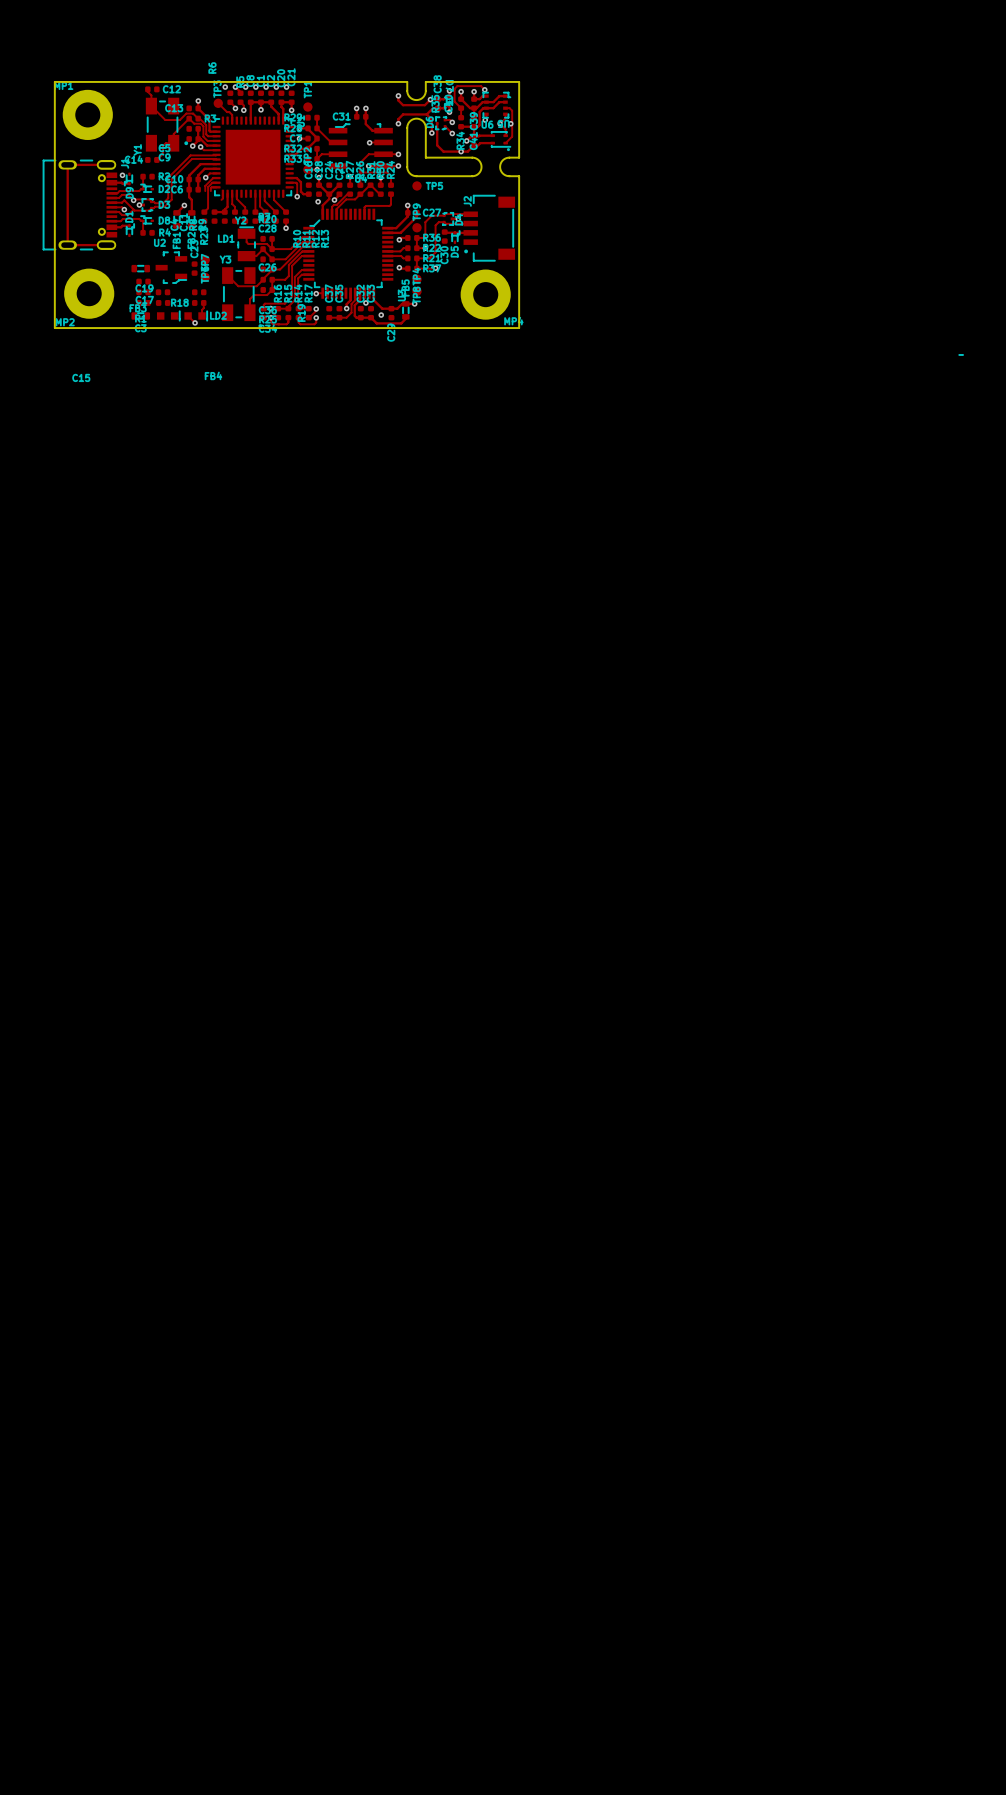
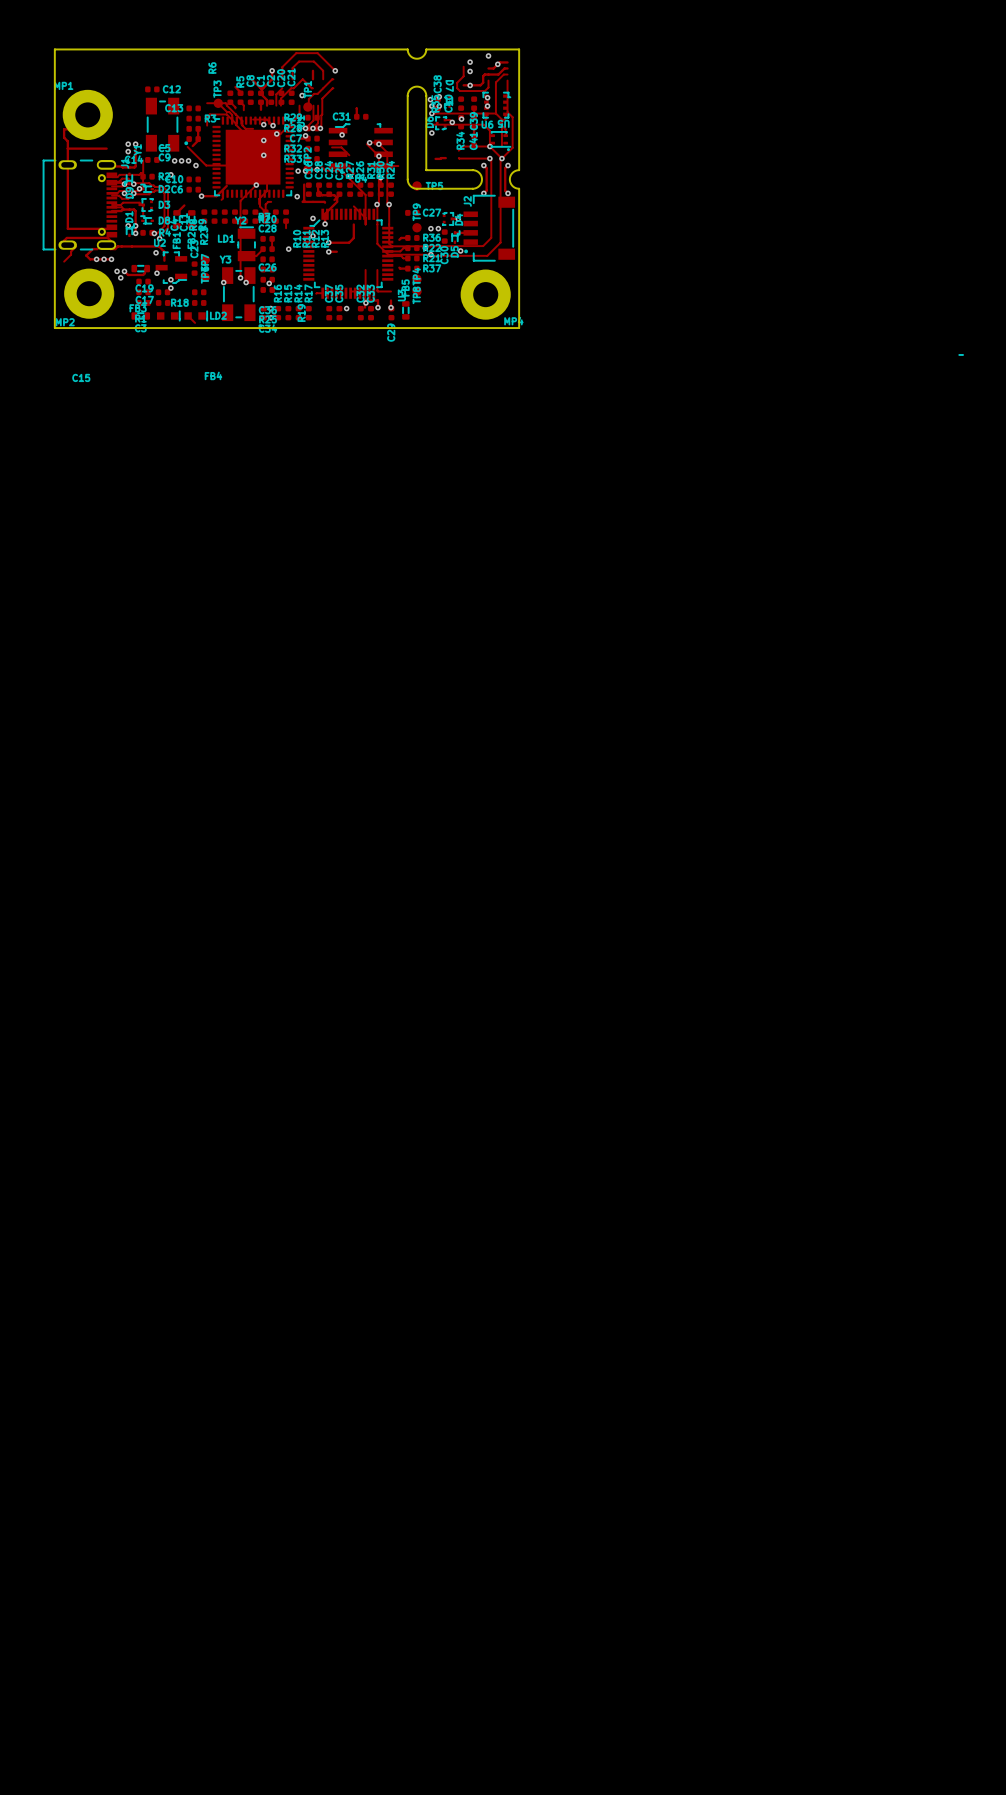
via: none -> (488, 55)
via: none -> (470, 62)
track: none -> (507, 62) (499, 62) (493, 68) (488, 68)
via: none -> (497, 64)
track: none -> (463, 66) (463, 76) (457, 82) (457, 88) (459, 91) (485, 91) (488, 87) (488, 80)
track: none -> (507, 68) (504, 68) (498, 74) (484, 74) (480, 85) (463, 85)
track: none -> (272, 70) (272, 79) (263, 88) (251, 79)
via: none -> (272, 70)
track: none -> (335, 70) (317, 53) (296, 53) (282, 67) (282, 79)
via: none -> (335, 70)
via: none -> (470, 71)
track: none -> (507, 74) (503, 74) (495, 82) (495, 113)
track: none -> (292, 79) (292, 68) (299, 61) (313, 61) (323, 70) (323, 79)
track: none -> (333, 79) (308, 99) (308, 105)
track: none -> (507, 80) (507, 112) (512, 117) (512, 147) (500, 159) (500, 242) (487, 255) (388, 254) (377, 243) (378, 156) (366, 144)
board edge: (54, 81) (407, 81) (408, 95) (416, 100) (424, 95) (425, 81) (519, 81) -> (54, 81) (54, 49) (407, 49) (410, 56) (417, 58) (423, 56) (426, 49) (519, 49) (519, 81)
via: none -> (470, 85)
via: (225, 87) -> none
via: (235, 87) -> none
via: (245, 87) -> none
via: (255, 87) -> none
via: (266, 87) -> none
via: (276, 87) -> none
via: (286, 87) -> none
track: none -> (261, 88) (261, 94) (267, 100) (267, 105)
track: none -> (282, 88) (276, 94) (276, 105)
track: none -> (312, 88) (302, 79) (280, 98) (280, 105)
track: none -> (333, 88) (322, 98) (320, 128)
track: (147, 89) (151, 95) (151, 106) (165, 120) (179, 120) (186, 113) (193, 113) (206, 125) (206, 134) (208, 136) (216, 136) -> none
track: (484, 89) (481, 86) (457, 86) (454, 88) (454, 101) (461, 108) (461, 117) -> none
via: (484, 89) -> none
track: (449, 90) (449, 96) (443, 99) (430, 99) (424, 105) (403, 105) (398, 100) (398, 95) -> none
via: (449, 90) -> none
track: (461, 91) (461, 99) (470, 108) (476, 108) (482, 102) (493, 102) (499, 96) (505, 96) -> none
via: (461, 91) -> none
track: (474, 91) (474, 99) (486, 96) -> none
via: (474, 91) -> none
via: none -> (302, 95)
via: (398, 95) -> none
via: none -> (439, 96)
via: none -> (487, 97)
track: (198, 100) (198, 108) (209, 119) (209, 130) (216, 131) -> none
via: (198, 100) -> none
track: (505, 102) (499, 102) (493, 108) (483, 108) (479, 111) (478, 126) (461, 126) -> none
track: none -> (207, 103) (225, 103) (235, 114)
track: none -> (299, 105) (299, 114) (280, 133) (276, 133)
track: none -> (313, 105) (313, 120) (305, 128)
track: none -> (318, 105) (318, 123) (312, 128)
via: none -> (431, 106)
via: none -> (439, 106)
via: none -> (487, 106)
via: (235, 108) -> none
via: (356, 108) -> none
track: (365, 108) (365, 124) (372, 130) (383, 130) -> none
via: (365, 108) -> none
track: (505, 108) (512, 110) (512, 136) (505, 143) -> none
via: (260, 109) -> none
via: (243, 110) -> none
track: (291, 110) (291, 102) (281, 102) (283, 120) -> none
via: (291, 110) -> none
track: (449, 112) (449, 106) (445, 106) (443, 108) (432, 108) (426, 114) -> none
via: (449, 112) -> none
track: none -> (431, 113) (495, 113)
via: none -> (431, 113)
track: none -> (495, 113) (501, 119) (501, 146)
track: none -> (235, 114) (242, 120) (242, 125) (245, 128) (253, 128)
track: (426, 114) (431, 119) (431, 133) -> none
track: (426, 114) (403, 114) (398, 119) (398, 123) -> none
track: (317, 117) (317, 128) (331, 142) (338, 142) -> none
track: none -> (253, 119) (267, 119) (273, 125)
via: none -> (461, 119)
track: (250, 120) (250, 102) (271, 102) (271, 106) (278, 113) (278, 120) -> none
via: (485, 120) -> none
via: (398, 123) -> none
track: (437, 123) (437, 145) (443, 151) (467, 151) (474, 145) (480, 143) (492, 143) -> none
via: (500, 123) -> none
via: (510, 123) -> none
via: none -> (263, 124)
track: none -> (431, 124) (483, 124) (489, 130) (489, 146)
track: none -> (207, 125) (207, 117) (209, 114) (226, 114) (244, 133) (253, 133)
via: none -> (273, 125)
track: (445, 126) (452, 133) -> none
board edge: (407, 127) (407, 167) (411, 174) (472, 176) (480, 171) (480, 163) (474, 157) (425, 157) (424, 123) (420, 119) (414, 118) (409, 122) (407, 127) -> (407, 95) (407, 179) (409, 185) (417, 188) (472, 188) (478, 186) (481, 178) (480, 173) (475, 170) (426, 170) (425, 93) (422, 88) (415, 86) (409, 90) (407, 95)
track: (299, 128) (308, 128) (317, 139) (308, 148) (301, 148) (295, 154) (289, 154) -> none
via: none -> (305, 128)
via: none -> (312, 128)
via: none -> (320, 128)
track: none -> (86, 130) (64, 129) (64, 137) (67, 141) (67, 228) (106, 228)
via: none -> (276, 133)
via: (452, 133) -> none
via: none -> (342, 134)
via: none -> (305, 135)
track: (492, 135) (471, 136) (466, 140) -> none
track: none -> (253, 138) (245, 138) (235, 147) (235, 156) (226, 165) (206, 165) (187, 146)
via: (299, 138) -> none
track: (198, 139) (207, 145) (216, 145) -> none
track: (216, 140) (207, 140) (203, 136) (203, 126) (200, 123) (194, 123) (189, 118) (173, 134) (173, 143) (165, 143) (163, 146) (163, 153) (156, 159) -> none
via: none -> (263, 140)
via: (466, 140) -> none
via: none -> (128, 144)
track: none -> (135, 144) (134, 167) (112, 166)
via: none -> (135, 144)
track: none -> (378, 144) (387, 152) (389, 243) (391, 246) (483, 246) (491, 237) (491, 159) (488, 157)
via: none -> (378, 144)
via: (192, 146) -> none
track: (200, 146) (203, 150) (216, 150) -> none
via: (200, 146) -> none
track: none -> (489, 146) (462, 146) (458, 150)
track: none -> (489, 146) (501, 158)
via: none -> (489, 146)
track: none -> (332, 147) (341, 147) (349, 155)
track: none -> (67, 148) (106, 148)
track: (317, 148) (317, 159) (321, 154) (338, 154) -> none
via: none -> (128, 151)
via: (461, 151) -> none
track: (216, 154) (190, 155) (168, 177) (168, 198) (163, 203) (155, 203) (149, 199) (133, 200) (128, 194) (111, 198) -> none
track: (398, 154) (368, 154) (360, 162) (360, 185) -> none
via: (398, 154) -> none
via: none -> (263, 155)
via: none -> (378, 156)
board edge: (519, 157) (505, 158) (502, 161) (500, 166) (502, 172) (505, 175) (519, 176) (519, 188) -> (519, 157) (519, 170) (512, 172) (509, 179) (512, 186) (519, 188)
track: none -> (445, 158) (435, 158)
track: none -> (458, 158) (489, 158)
via: none -> (489, 158)
via: none -> (501, 158)
track: (216, 159) (192, 158) (171, 179) (171, 199) (164, 206) (155, 206) (149, 210) (134, 210) (124, 200) (122, 202) (111, 202) -> none
track: none -> (143, 160) (142, 172) (112, 177)
via: none -> (174, 160)
via: none -> (181, 160)
via: none -> (188, 160)
track: (106, 164) (67, 164) (67, 245) (106, 245) -> none
track: (216, 164) (200, 164) (189, 175) (189, 197) (191, 199) (191, 212) -> none
via: none -> (195, 165)
track: none -> (349, 165) (349, 169) (353, 173)
via: (368, 165) -> none
via: (398, 165) -> none
track: none -> (483, 165) (486, 168) (486, 190) (483, 193)
via: none -> (483, 165)
track: none -> (508, 165) (505, 168) (505, 190) (508, 193)
via: none -> (508, 165)
track: none -> (321, 166) (325, 170) (341, 170) (365, 194) (365, 224)
track: (216, 168) (204, 168) (198, 175) (198, 189) -> none
via: none -> (298, 171)
via: none -> (305, 171)
track: (360, 172) (387, 172) (391, 176) (391, 185) -> none
track: (216, 173) (209, 173) (205, 177) -> none
via: none -> (170, 174)
via: (122, 175) -> none
track: (350, 176) (350, 185) -> (312, 70) (312, 79)
via: (205, 177) -> none
track: (319, 177) (319, 185) (328, 194) (339, 185) -> none
via: (319, 177) -> none
track: (216, 178) (213, 178) (205, 185) (205, 191) -> none
track: (289, 178) (296, 178) (300, 182) (300, 191) (303, 194) (308, 194) -> none
track: none -> (112, 181) (128, 178) (133, 184) (149, 183) (155, 186) (163, 186) (168, 191) (168, 227) (159, 235) (159, 238)
track: (216, 182) (212, 182) (208, 187) (208, 208) (204, 212) -> none
track: (289, 182) (297, 183) (297, 196) -> none
via: none -> (124, 184)
via: none -> (133, 184)
track: none -> (267, 184) (267, 191) (259, 198) (259, 204)
track: none -> (304, 184) (302, 201) (325, 202)
track: none -> (318, 184) (318, 191) (322, 195) (334, 195) (337, 198) (337, 201) (325, 213) (325, 224)
track: none -> (226, 185) (216, 196) (201, 196)
track: none -> (256, 185) (240, 200) (240, 277)
via: none -> (256, 185)
track: none -> (112, 186) (122, 186) (124, 184) (134, 194) (149, 194) (155, 190) (161, 190) (164, 193) (164, 226) (157, 233) (154, 233)
track: (216, 187) (211, 187) (210, 191) -> none
via: none -> (139, 188)
via: none -> (124, 193)
via: none -> (133, 193)
track: (227, 193) (227, 206) (224, 212) (214, 212) -> none
track: (232, 193) (232, 204) (234, 206) (234, 212) -> none
track: (236, 193) (236, 198) (245, 207) (245, 212) -> none
track: (255, 193) (255, 212) -> none
track: (264, 193) (264, 200) (275, 212) -> none
track: (273, 193) (273, 200) (286, 212) -> none
via: none -> (483, 193)
via: none -> (508, 193)
track: (329, 194) (329, 198) (322, 205) (322, 214) -> none
track: (350, 194) (347, 194) (332, 206) (332, 214) -> none
track: (380, 194) (369, 185) (355, 199) (346, 199) (336, 208) (336, 214) -> none
track: (391, 194) (389, 205) (365, 205) (364, 214) -> none
via: none -> (201, 196)
via: (133, 200) -> none
via: (334, 200) -> none
track: none -> (271, 201) (265, 204) (265, 215) (259, 218)
via: (318, 201) -> none
via: none -> (377, 204)
via: none -> (389, 204)
via: (139, 205) -> none
via: (184, 205) -> none
track: (407, 205) (407, 216) (396, 228) (387, 228) -> none
via: (407, 205) -> none
track: none -> (353, 206) (365, 218)
via: (124, 209) -> none
track: (133, 209) (128, 215) (111, 211) -> (133, 193) (128, 198) (112, 195)
track: none -> (112, 211) (134, 209) (135, 233)
track: (416, 212) (416, 216) (400, 232) (387, 232) -> none
track: (470, 214) (431, 215) (425, 222) (425, 235) (423, 237) (416, 237) (416, 248) (425, 248) -> none
via: none -> (312, 218)
track: (111, 221) (139, 218) (143, 221) (143, 232) -> (112, 205) (139, 202) (143, 204) (143, 216)
track: (470, 223) (438, 222) (435, 225) (435, 252) (429, 258) (416, 258) (416, 268) (435, 268) -> none
via: none -> (325, 224)
track: none -> (353, 224) (353, 238) (349, 242) (328, 242)
via: none -> (128, 225)
track: (129, 225) (111, 227) -> none
via: none -> (135, 225)
via: (286, 228) -> none
via: none -> (430, 228)
via: none -> (438, 228)
track: (444, 232) (454, 232) -> none
via: none -> (135, 233)
via: none -> (154, 233)
track: (246, 233) (248, 243) (266, 243) (272, 249) (290, 249) (302, 237) (308, 237) -> none
via: none -> (312, 236)
via: none -> (159, 238)
via: (399, 239) -> none
track: (308, 242) (302, 242) (285, 259) (272, 259) (263, 249) -> none
via: none -> (328, 242)
track: none -> (76, 246) (64, 261)
track: (308, 246) (302, 246) (280, 269) (272, 269) (256, 286) (238, 286) (227, 275) -> none
track: none -> (64, 247) (64, 240) (66, 237) (107, 237) (110, 240) (110, 249) (115, 249) (117, 246) (158, 246) (164, 251) (164, 260)
track: none -> (97, 249) (92, 249) (86, 255)
via: none -> (288, 249)
via: none -> (460, 250)
track: (308, 251) (302, 251) (288, 264) (288, 276) (285, 279) (272, 279) (272, 289) (267, 295) (254, 295) (249, 299) (249, 312) -> none
via: none -> (328, 251)
track: none -> (336, 251) (328, 251)
via: none -> (156, 252)
track: none -> (86, 255) (90, 259) (111, 259)
track: (308, 256) (301, 256) (292, 265) (292, 296) (284, 303) (264, 303) (263, 308) -> none
via: none -> (96, 259)
via: none -> (104, 259)
via: none -> (111, 259)
via: (399, 267) -> none
via position: (435, 268) -> (430, 254)
track: none -> (144, 269) (143, 274) (128, 274) (124, 271)
track: (308, 270) (301, 270) (294, 276) (294, 300) (288, 308) (278, 308) -> none
track: none -> (365, 270) (365, 290) (352, 291)
track: none -> (377, 270) (377, 290) (391, 291)
via: none -> (117, 271)
via: none -> (124, 271)
via: none -> (156, 273)
track: (308, 274) (301, 274) (298, 278) (298, 308) (308, 308) -> none
via: none -> (120, 277)
via: none -> (240, 277)
via: none -> (170, 279)
via: none -> (223, 282)
via: none -> (246, 282)
via: none -> (269, 283)
via: none -> (170, 288)
via: (316, 293) -> none
track: (350, 293) (350, 300) (346, 304) (346, 308) -> none
track: (355, 293) (355, 300) (351, 303) (351, 312) (346, 317) (329, 317) -> none
track: (359, 293) (359, 300) (354, 305) (356, 317) (371, 317) (376, 323) (401, 323) (405, 316) -> none
track: (373, 293) (373, 300) (382, 308) (397, 308) (402, 303) (414, 303) -> none
track: none -> (391, 300) (391, 307)
track: (203, 302) (202, 315) -> none
via: (414, 303) -> none
track: none -> (365, 307) (365, 300) (378, 300) (378, 307)
via: none -> (378, 307)
via: none -> (391, 307)
track: (316, 309) (308, 317) -> none
via: (316, 309) -> none
via: (381, 315) -> none
track: (288, 317) (286, 324) (273, 324) (271, 317) -> none
track: (298, 317) (300, 324) (314, 324) (316, 317) -> none
via: (316, 317) -> none
via: (195, 322) -> none

